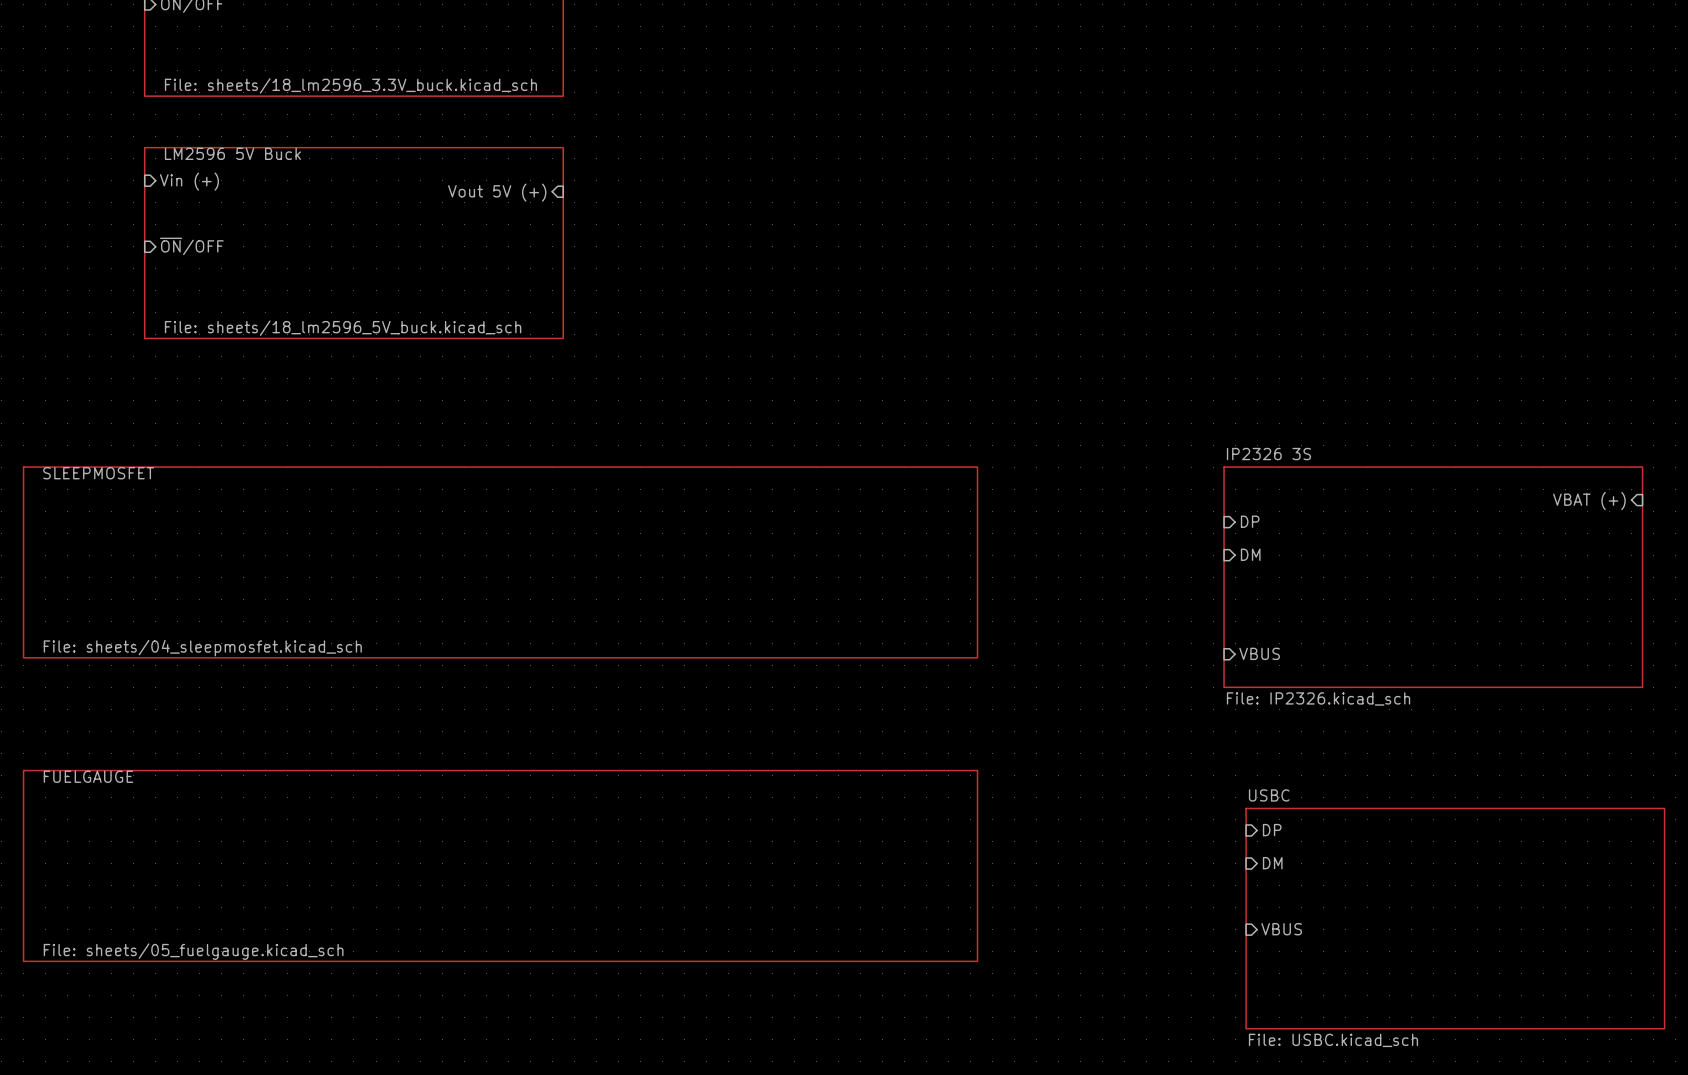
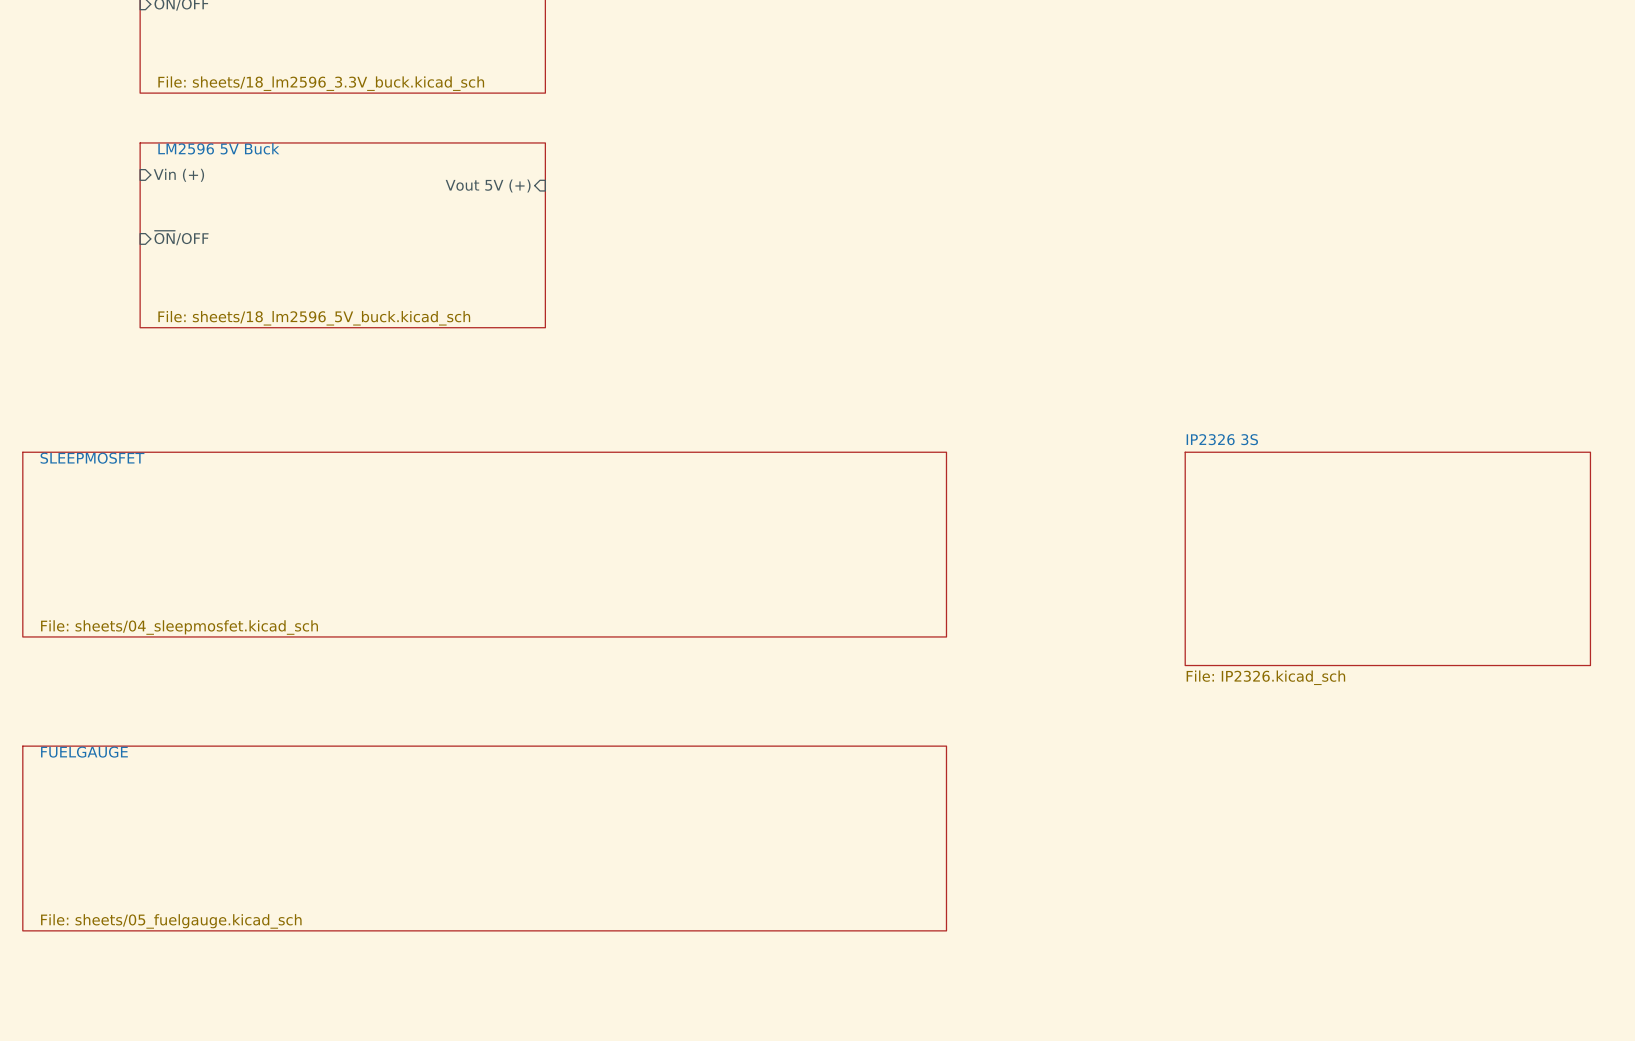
sheet pin: VBAT (+) (1589, 500) -> none
sheet pin: DP (1250, 521) -> none
sheet pin: DM (1250, 554) -> none
sheet pin: VBUS (1259, 653) -> none
sheet pin: DP (1272, 830) -> none
sheet pin: DM (1272, 863) -> none
sheet USBC: File: USBC.kicad_sch (1455, 918) -> none
sheet pin: VBUS (1281, 929) -> none

